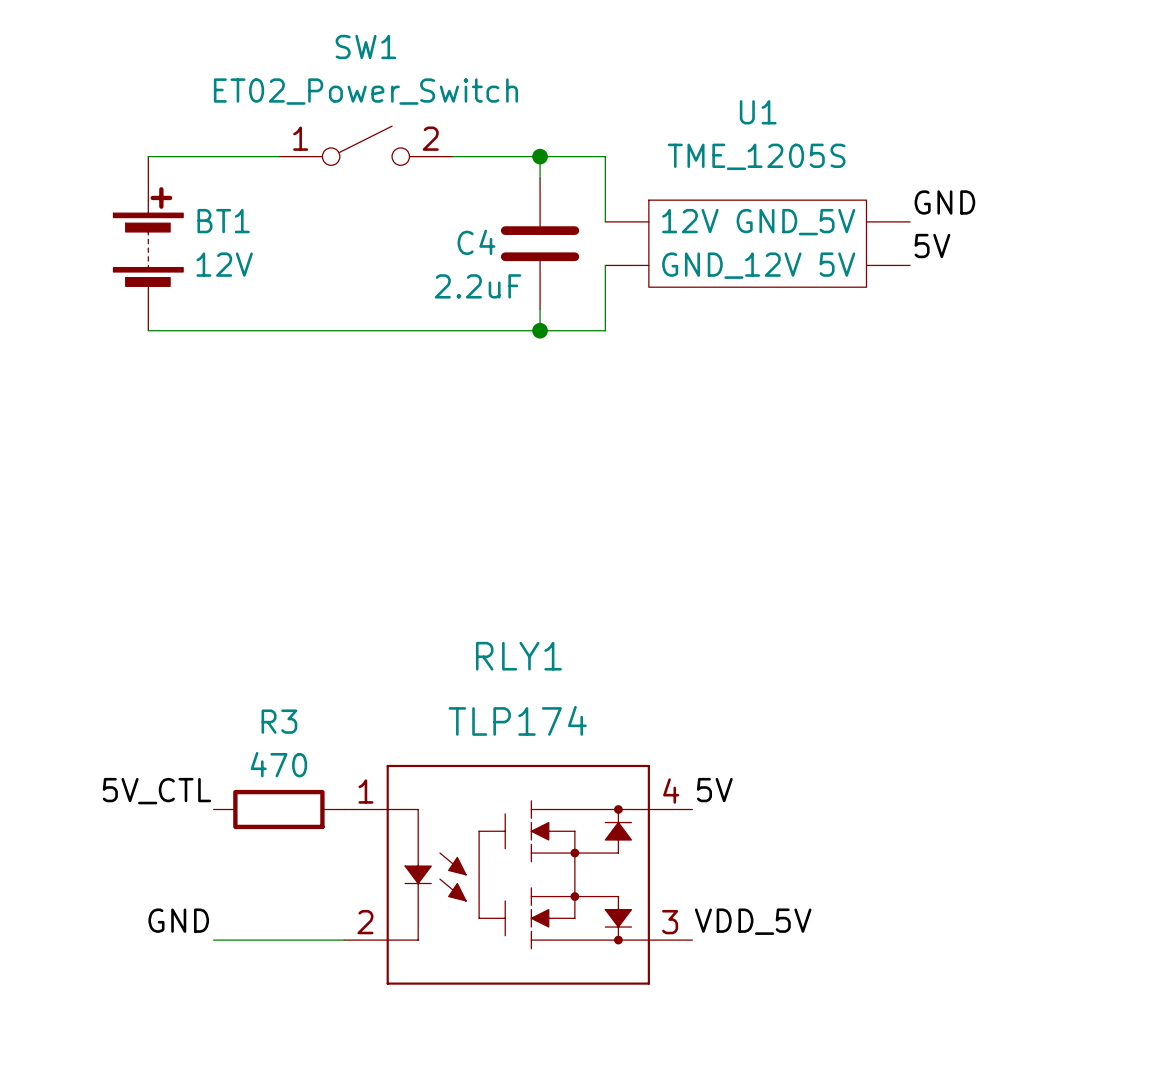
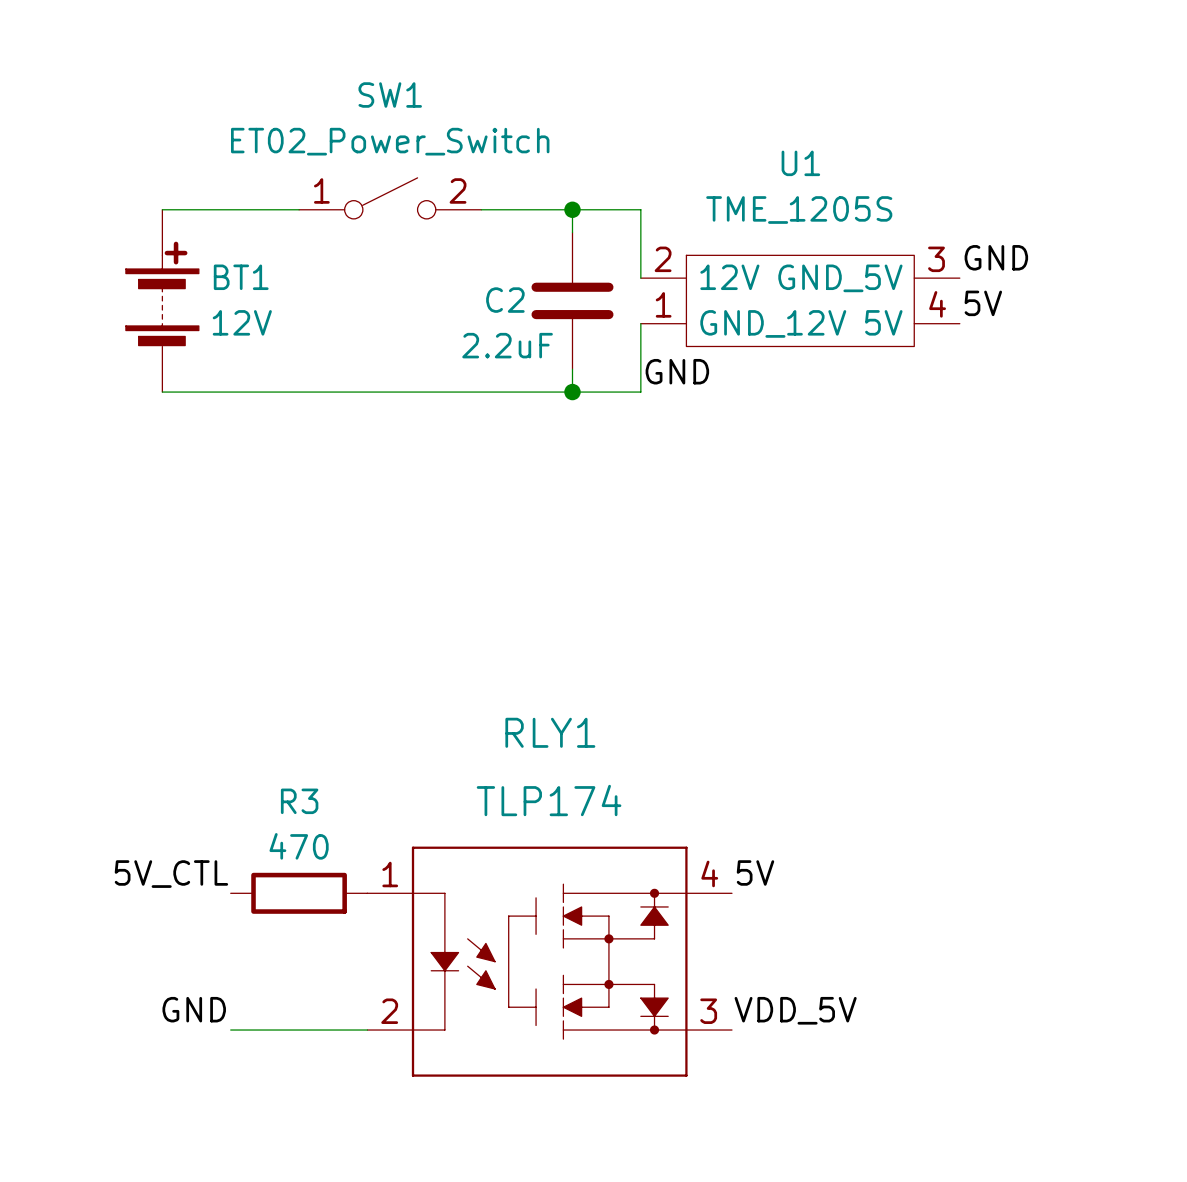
U1 pin number: none -> 2 (663, 259)
U1 pin number: none -> 3 (936, 259)
C4 name: C4 (476, 242) -> C2 (505, 300)
U1 pin number: none -> 4 (937, 304)
U1 pin number: none -> 1 (663, 304)
label: none -> GND (677, 371)

